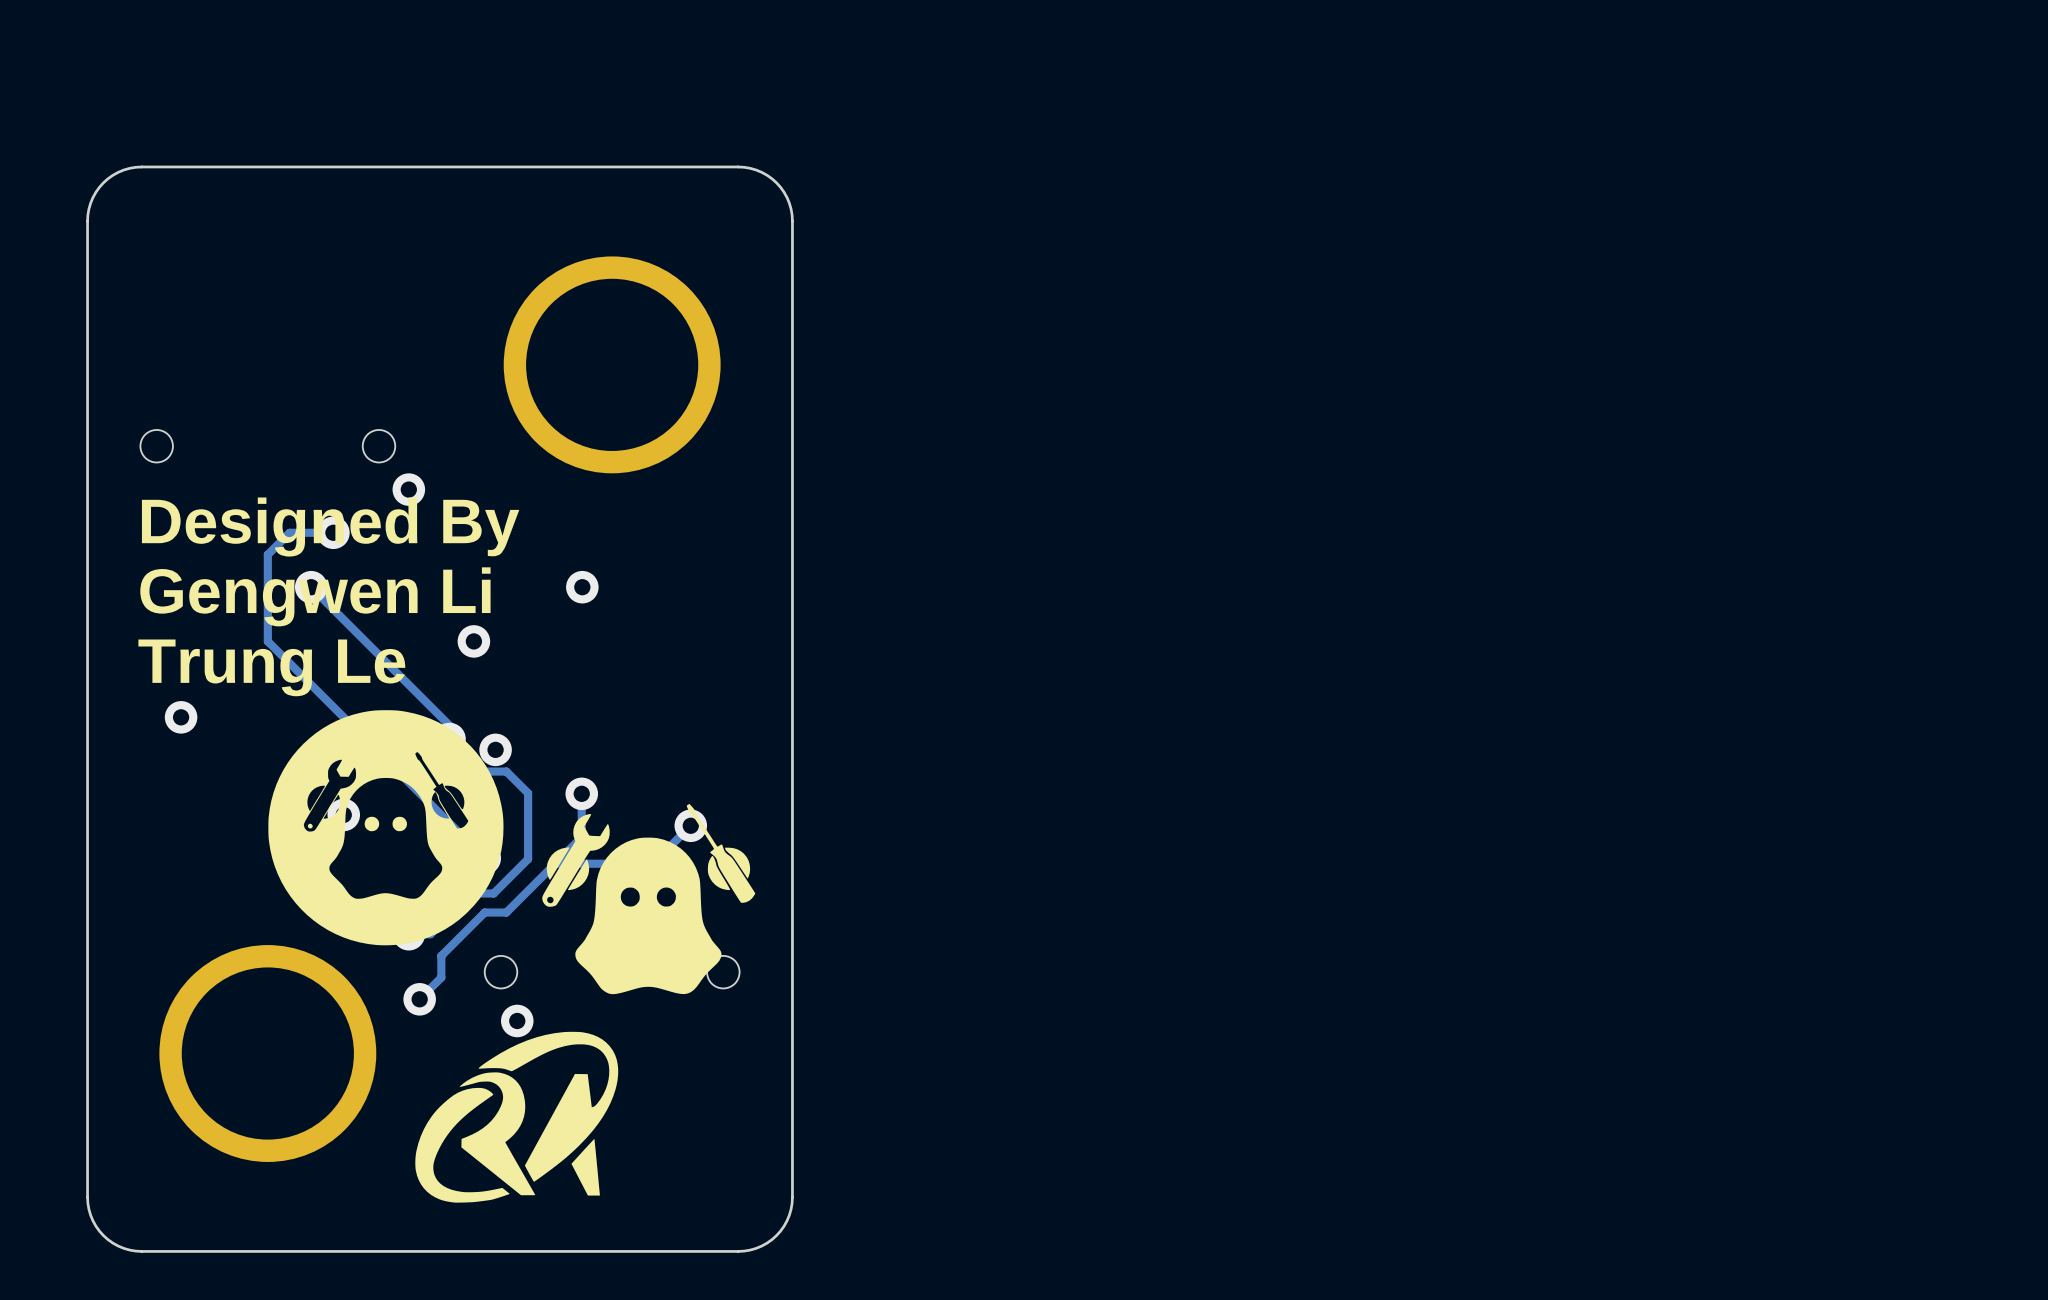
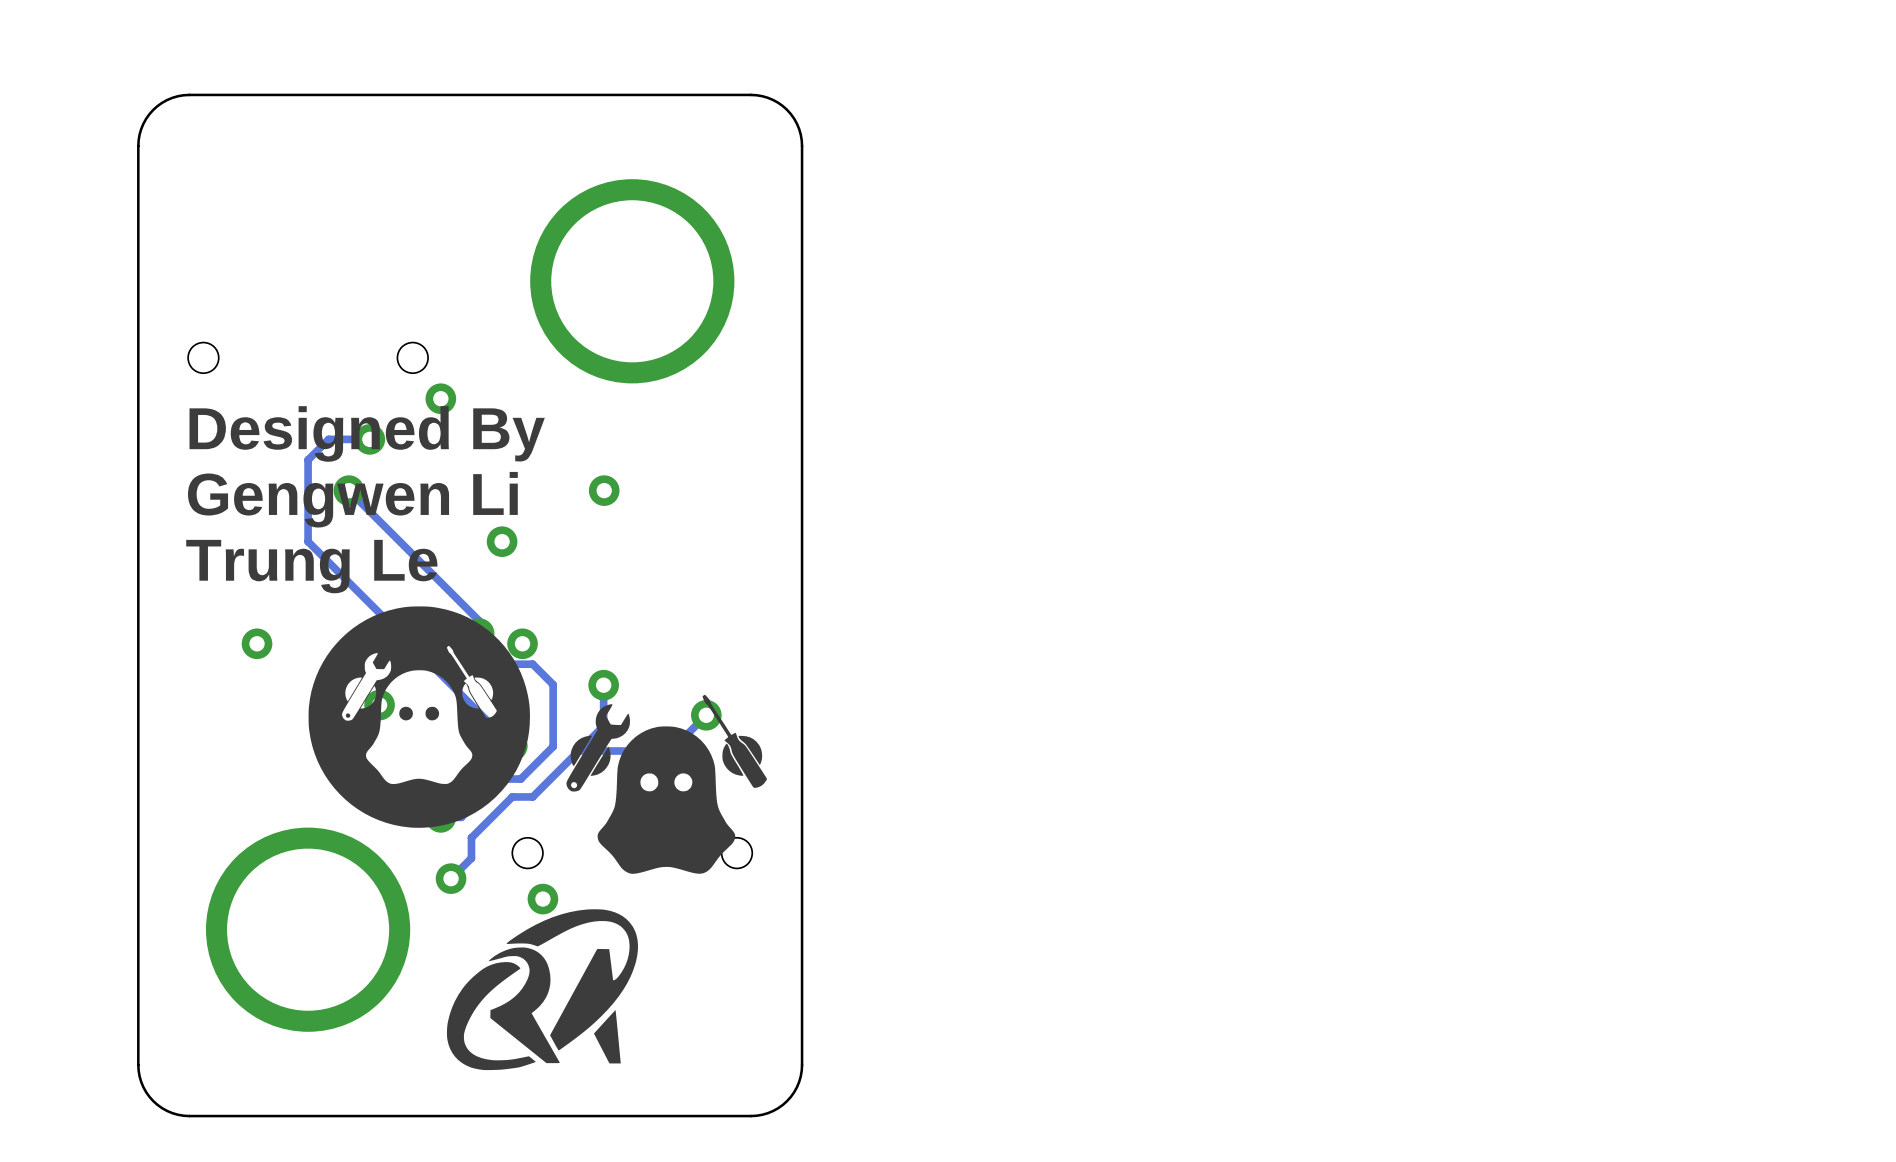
via position: (181, 717) -> (257, 643)

